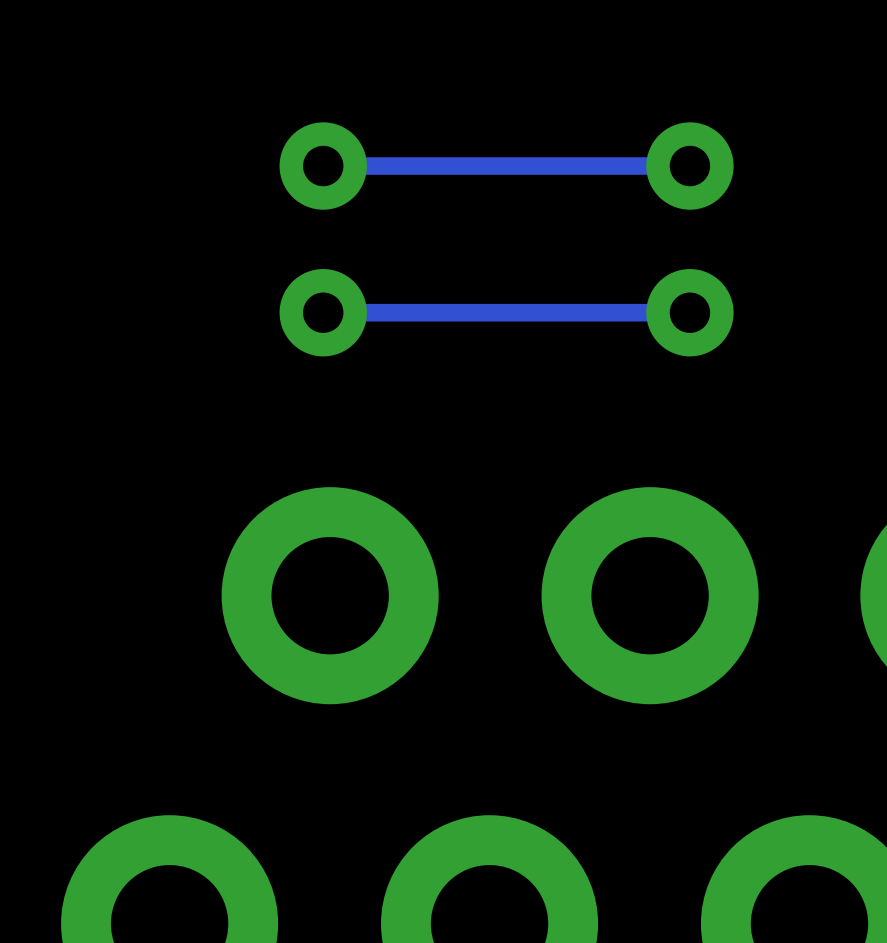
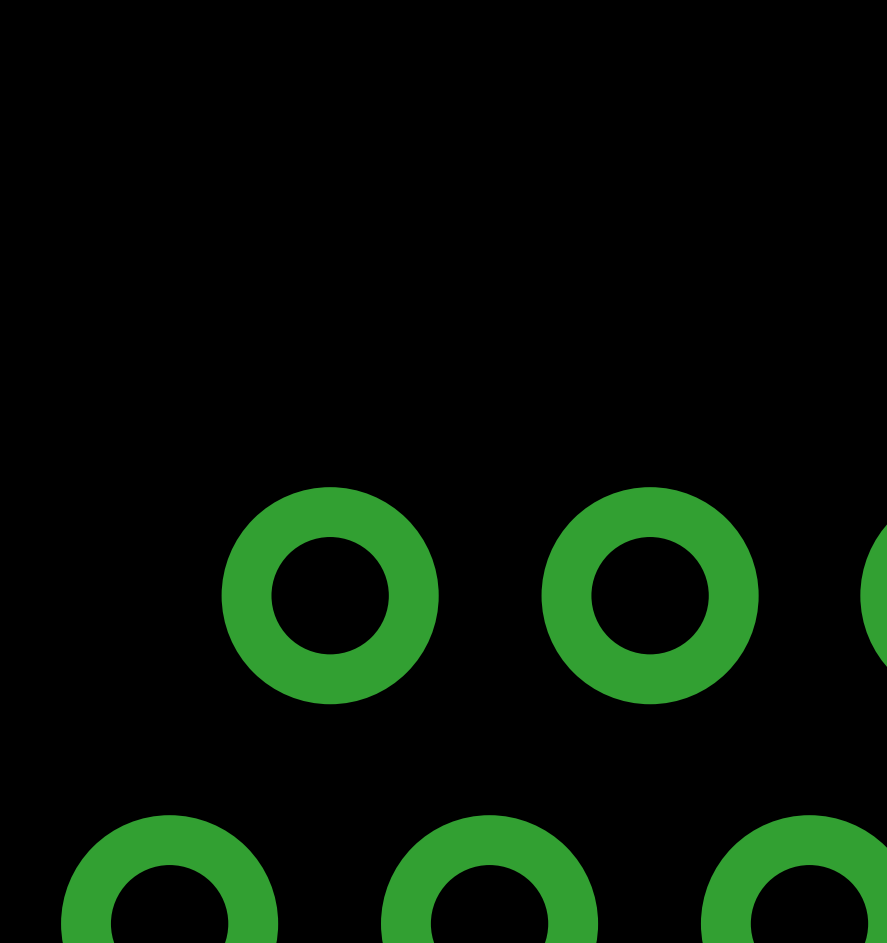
via: (323, 166) -> none
track: (689, 166) (323, 166) -> none
via: (689, 166) -> none
via: (323, 312) -> none
track: (689, 312) (323, 312) -> none
via: (689, 312) -> none

